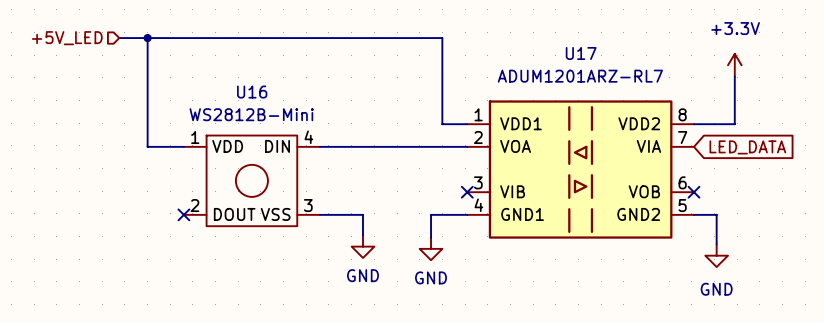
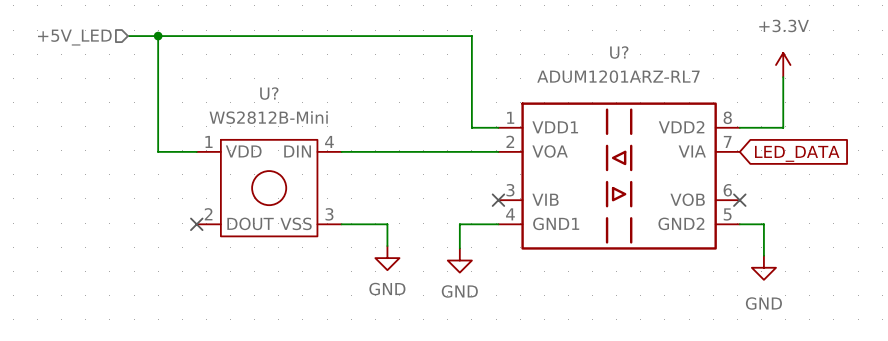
U17 name: U17 (581, 53) -> U? (619, 52)
U16 name: U16 (252, 92) -> U? (269, 93)

